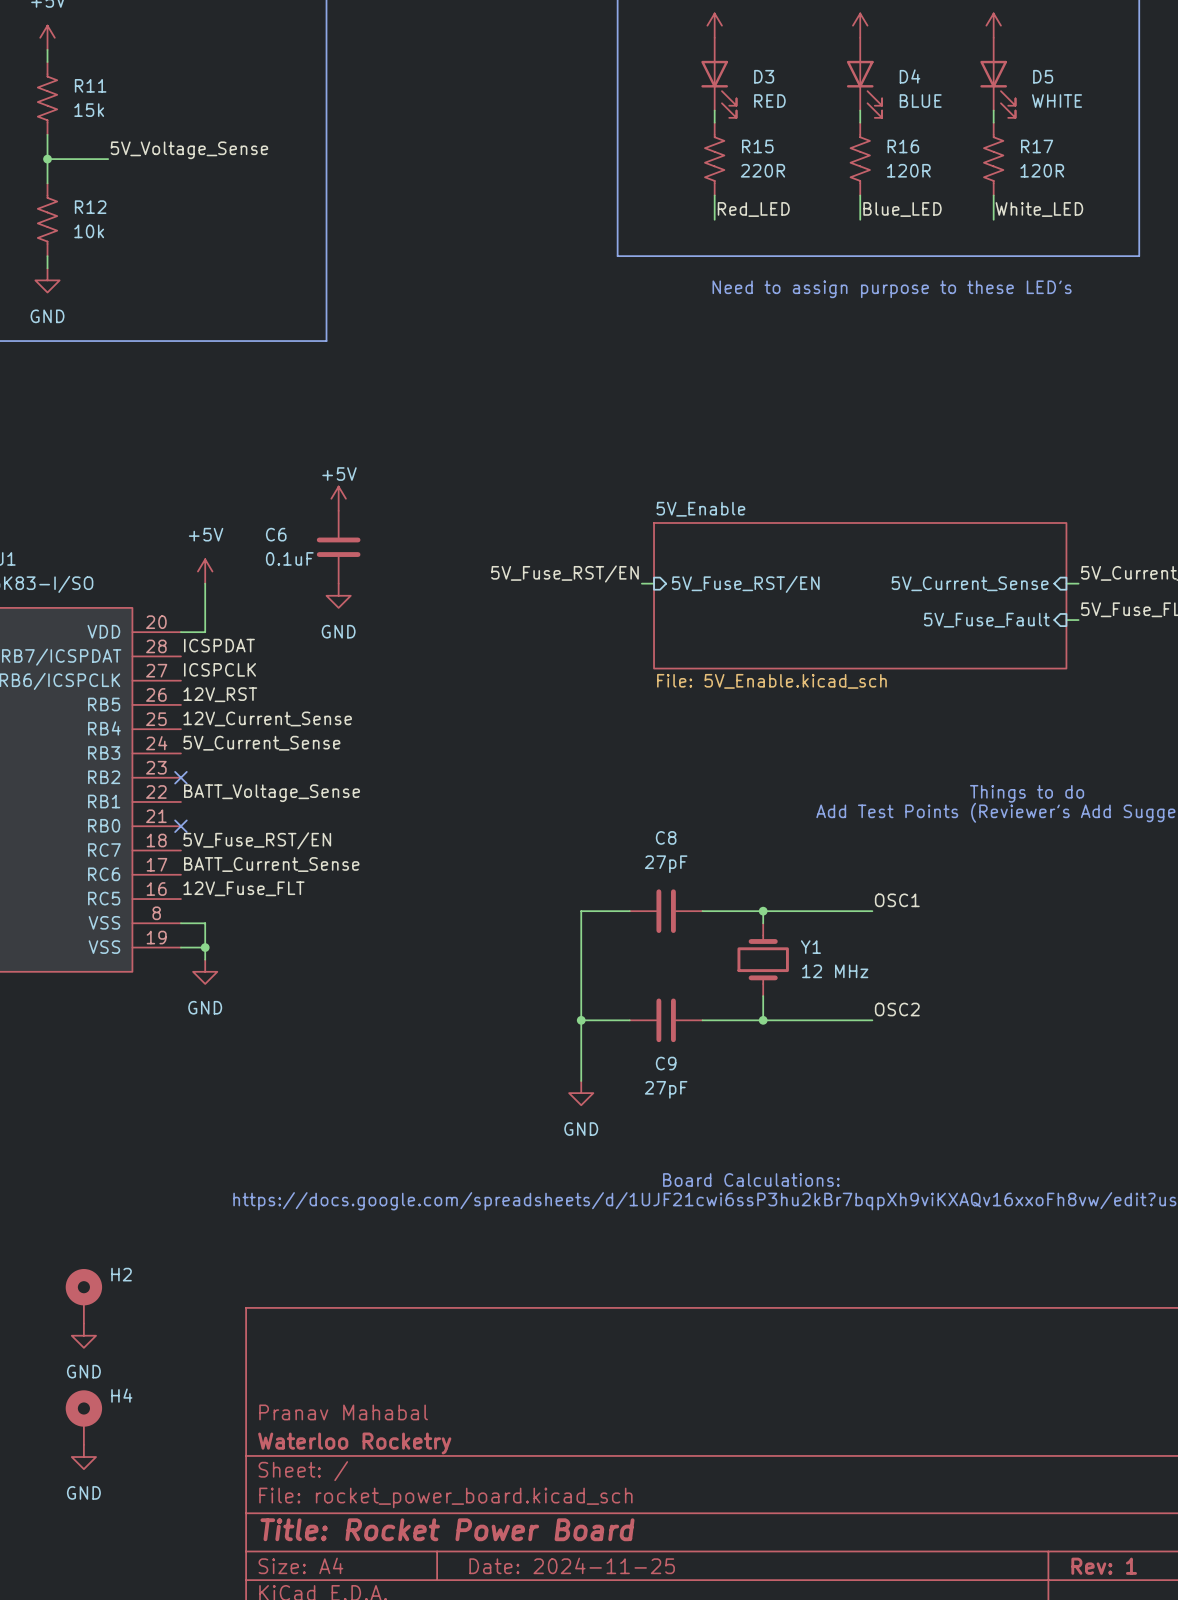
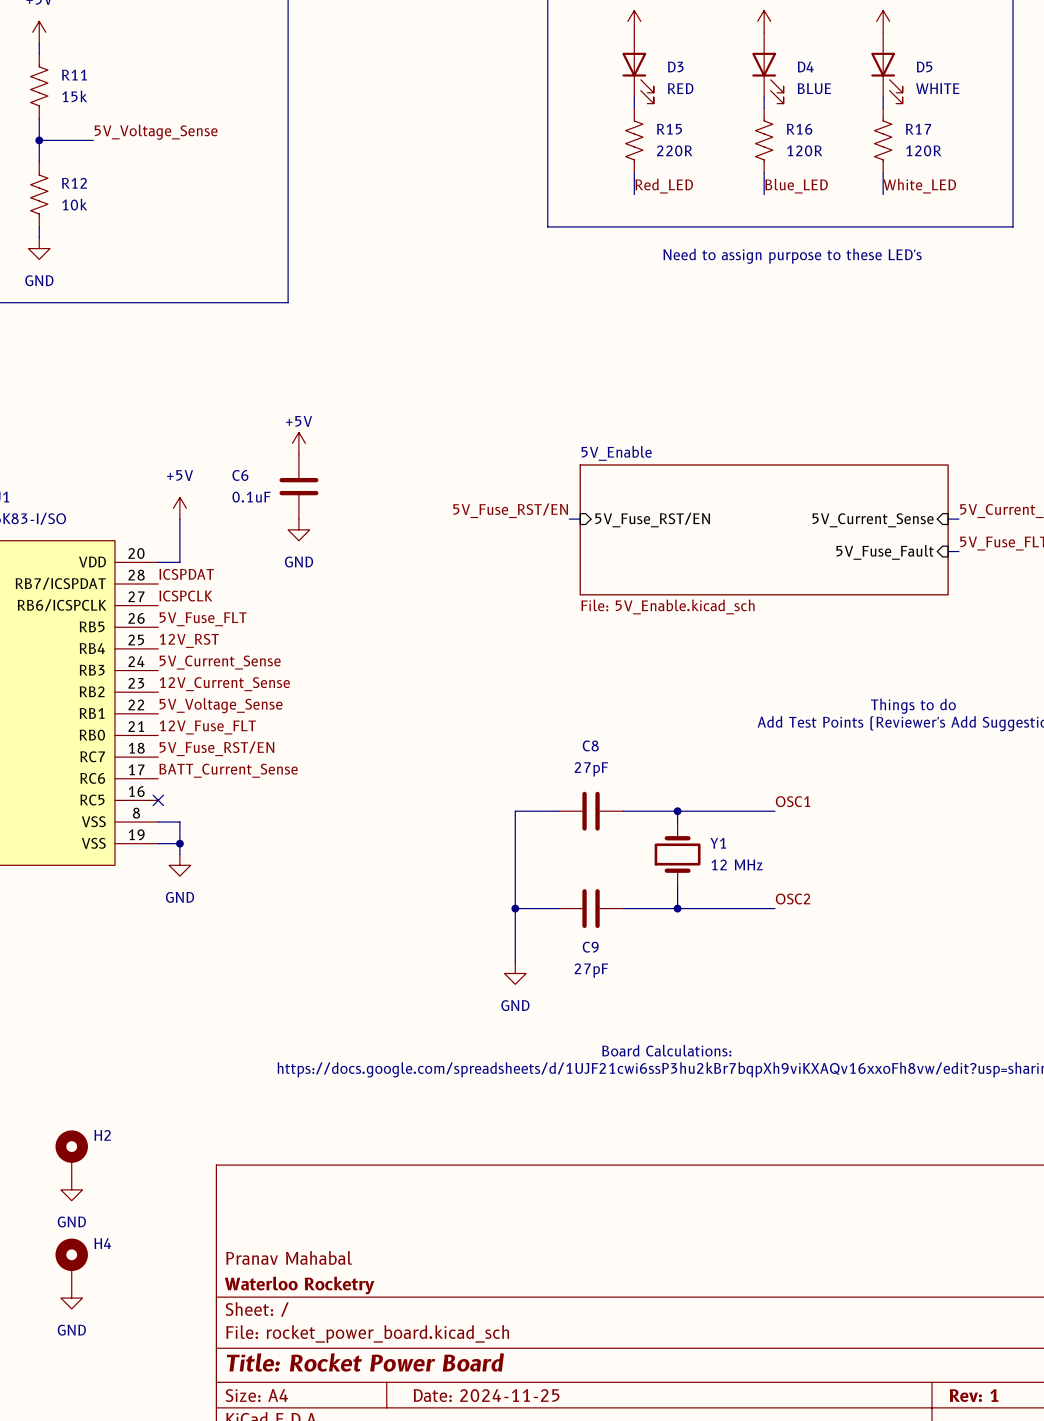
label: 12V_RST (220, 694) -> 5V_Fuse_FLT (203, 619)
label: 12V_Current_Sense (267, 718) -> 12V_RST (189, 640)
label: none -> 12V_Current_Sense (224, 684)
no-connect mark: (180, 777) -> none
label: BATT_Voltage_Sense (272, 793) -> 5V_Voltage_Sense (221, 705)
no-connect mark: (180, 826) -> none
label position: 12V_Fuse_FLT (244, 888) -> 12V_Fuse_FLT (207, 727)
no-connect mark: none -> (158, 800)

